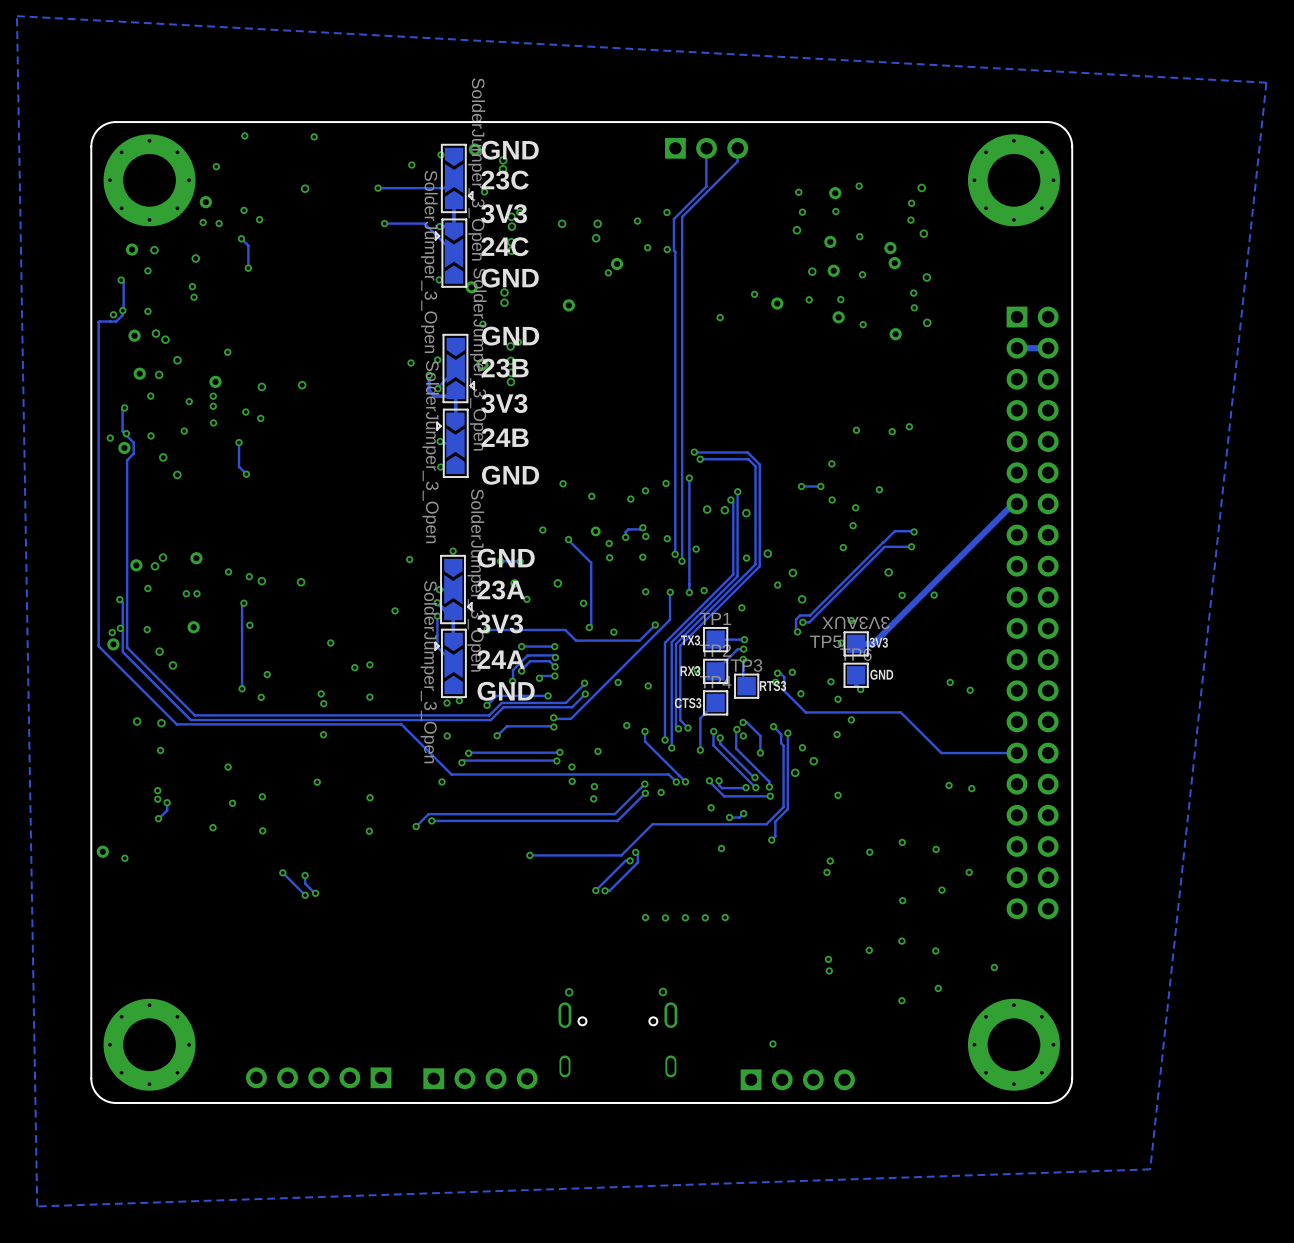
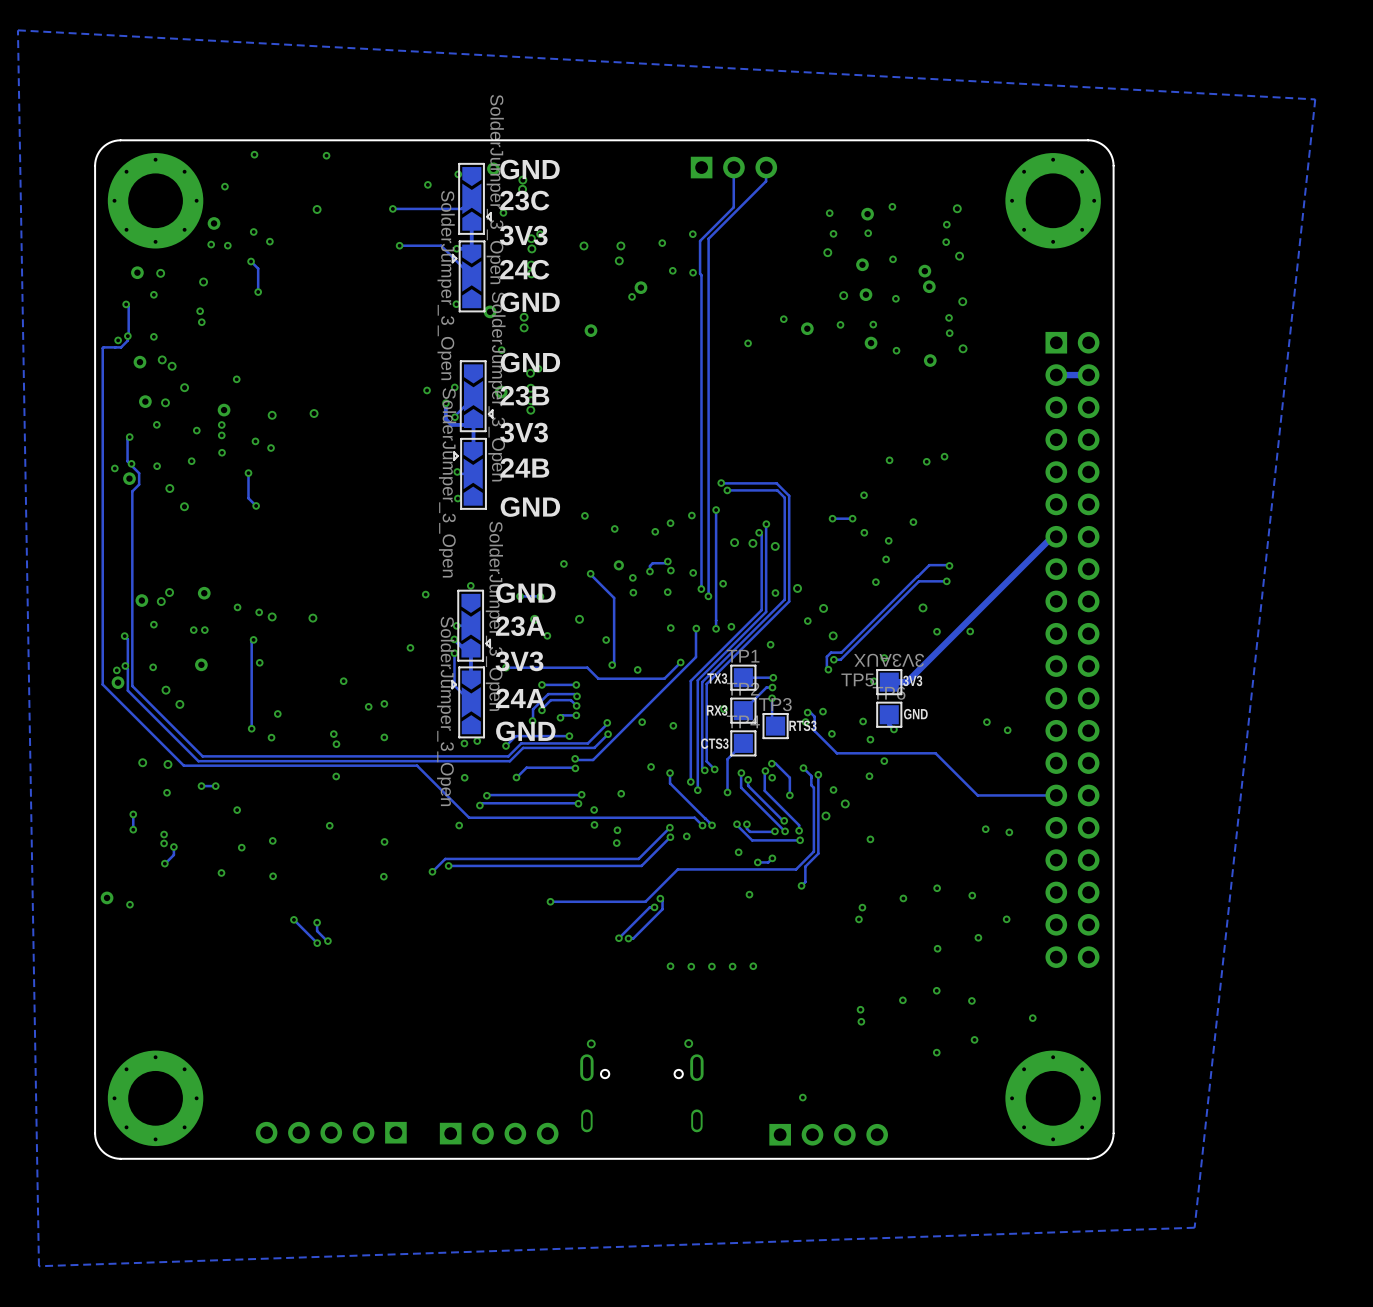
via: none -> (201, 786)
track: none -> (215, 786) (201, 786)
via: none -> (215, 786)
track: none -> (133, 814) (133, 829)
via: none -> (133, 814)
via: none -> (133, 829)

